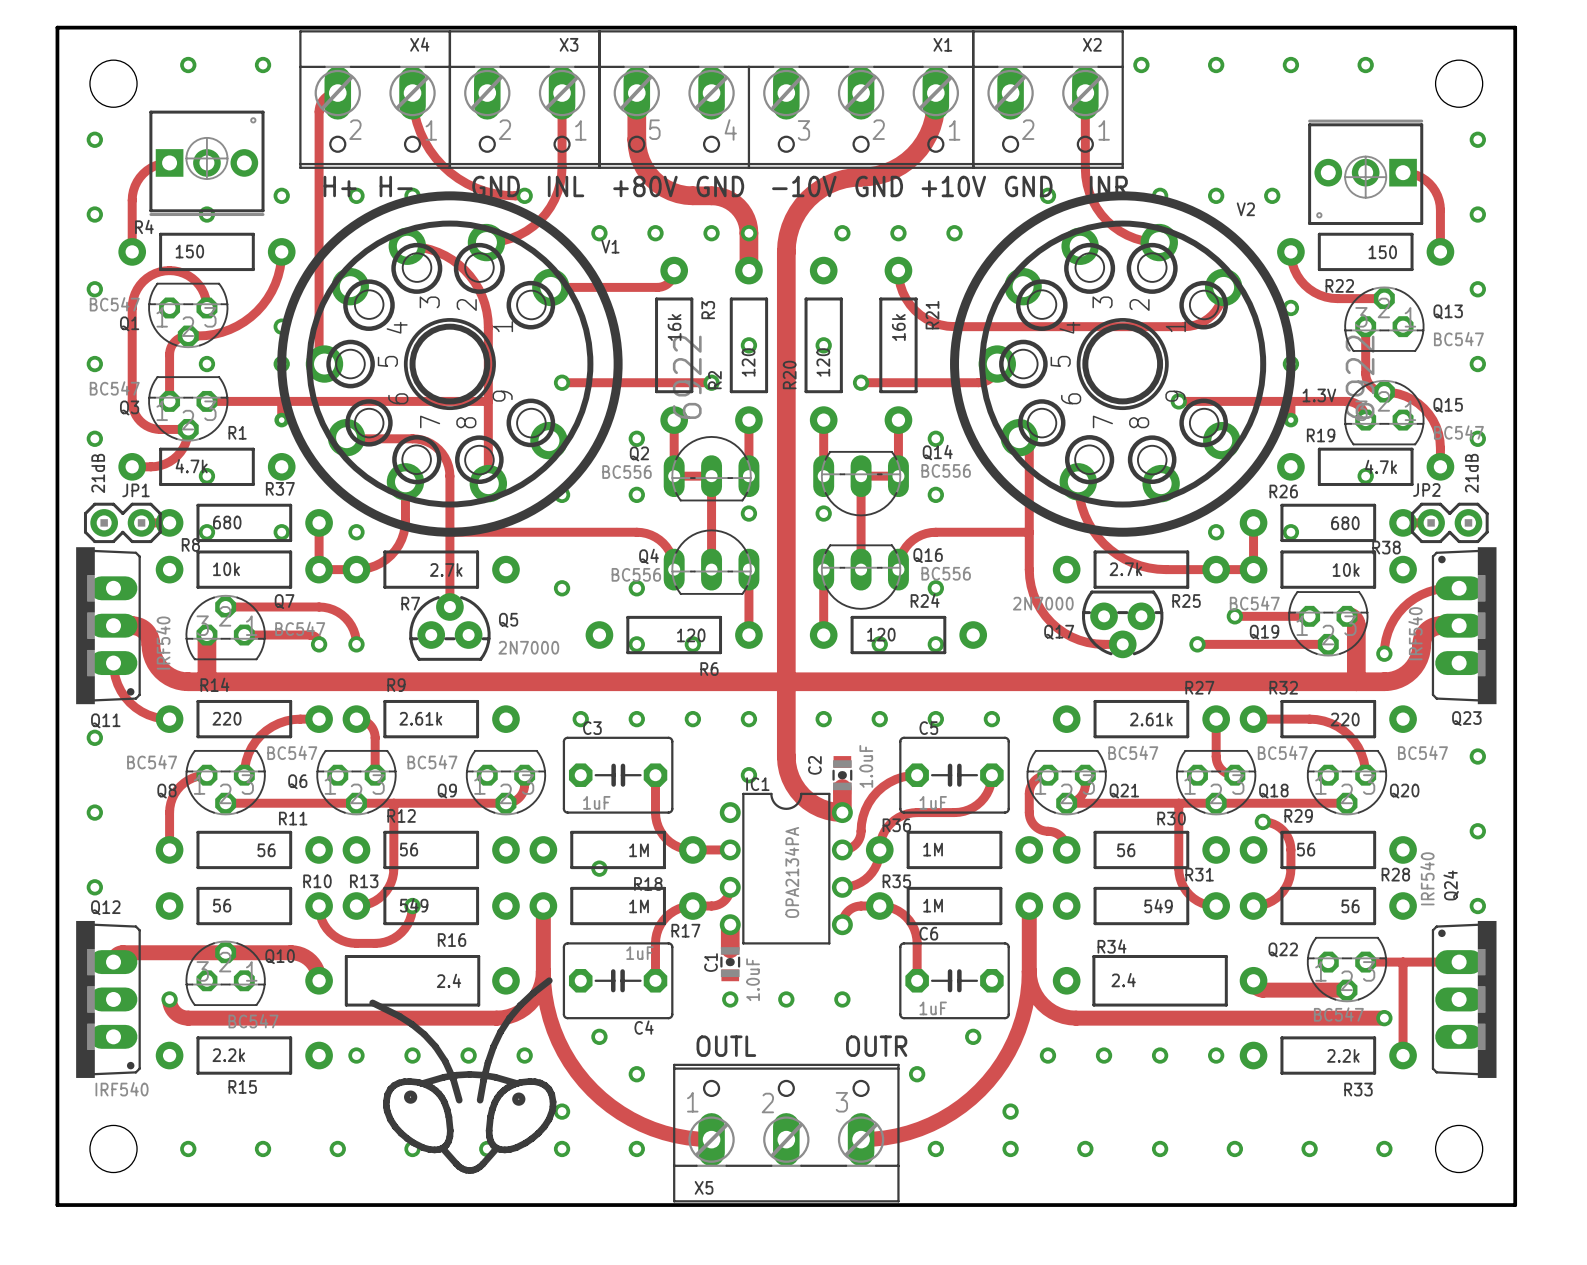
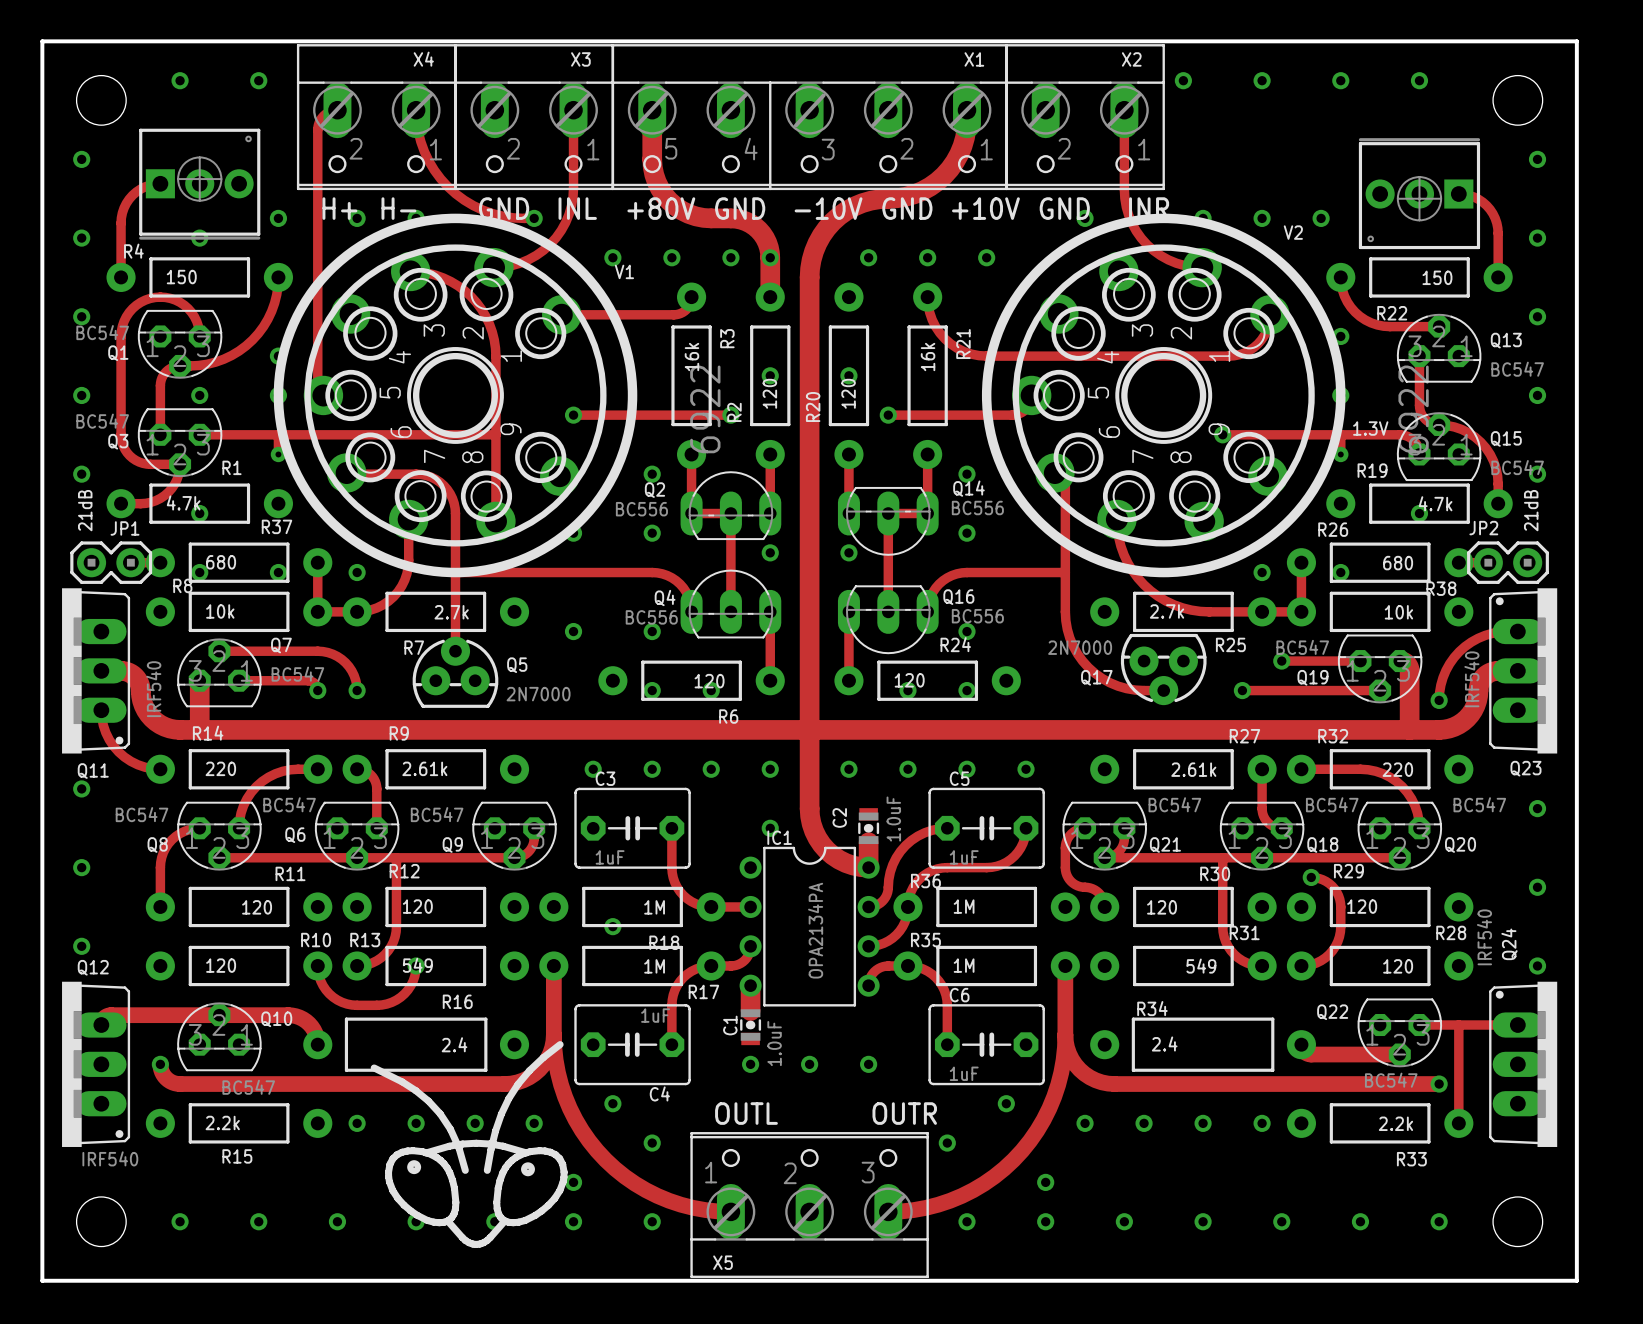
R12 value: 56 (409, 849) -> 120 (417, 906)
R29 value: 56 (1306, 849) -> 120 (1362, 906)
R11 value: 56 (266, 850) -> 120 (257, 907)
R30 value: 56 (1126, 850) -> 120 (1162, 907)
R10 value: 56 (222, 905) -> 120 (221, 965)
R28 value: 56 (1350, 906) -> 120 (1398, 966)

